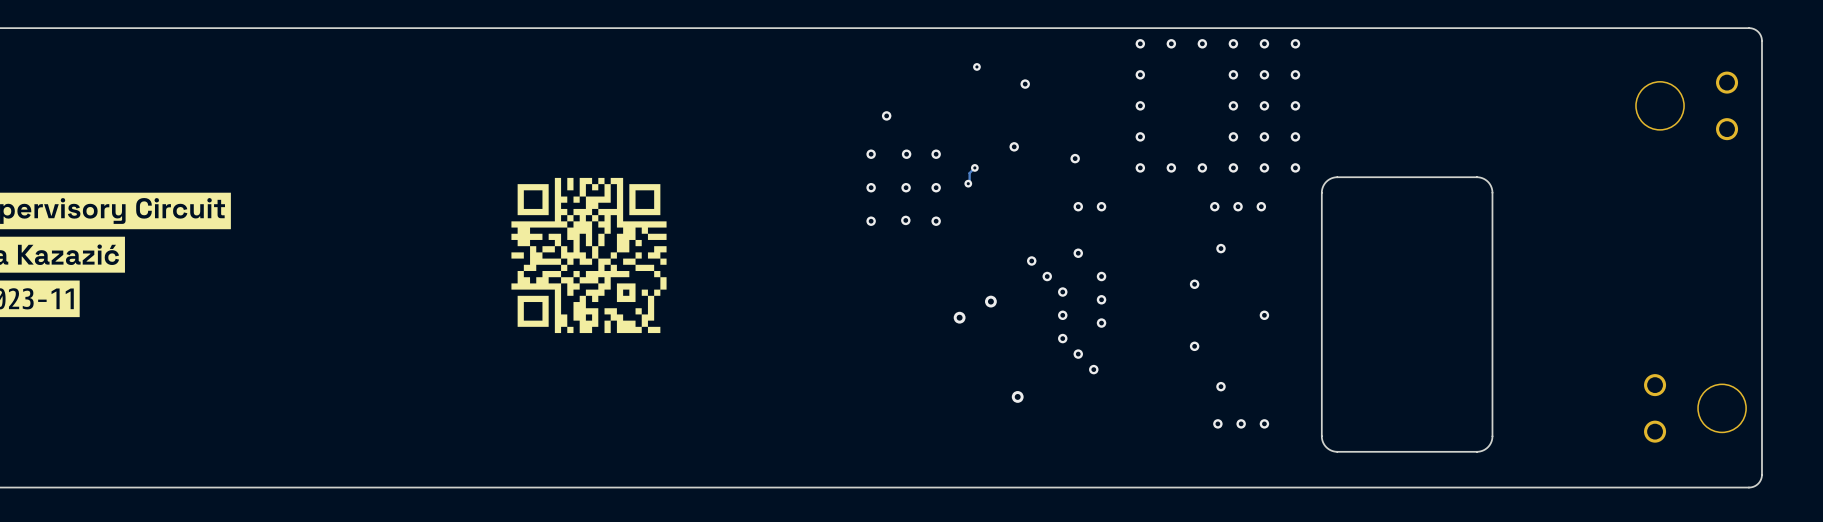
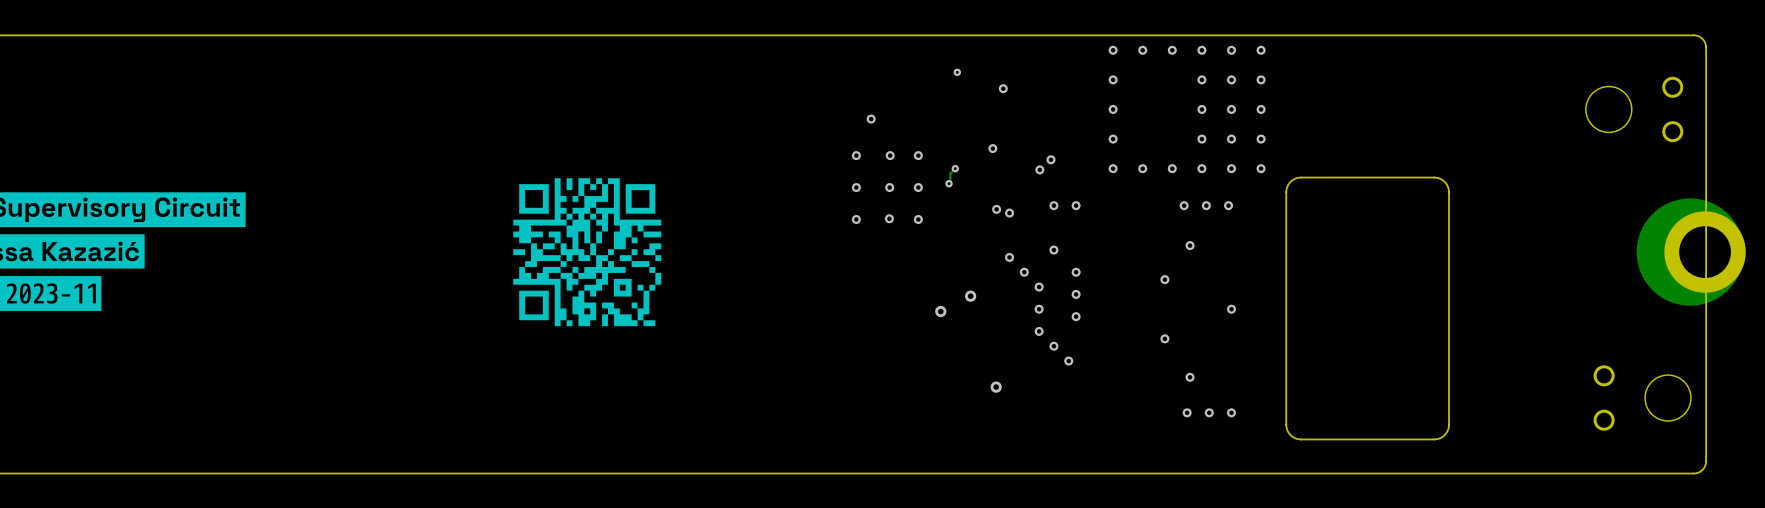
via: none -> (1039, 169)
via: none -> (996, 209)
via: none -> (1009, 213)
part: none -> (1691, 252)

